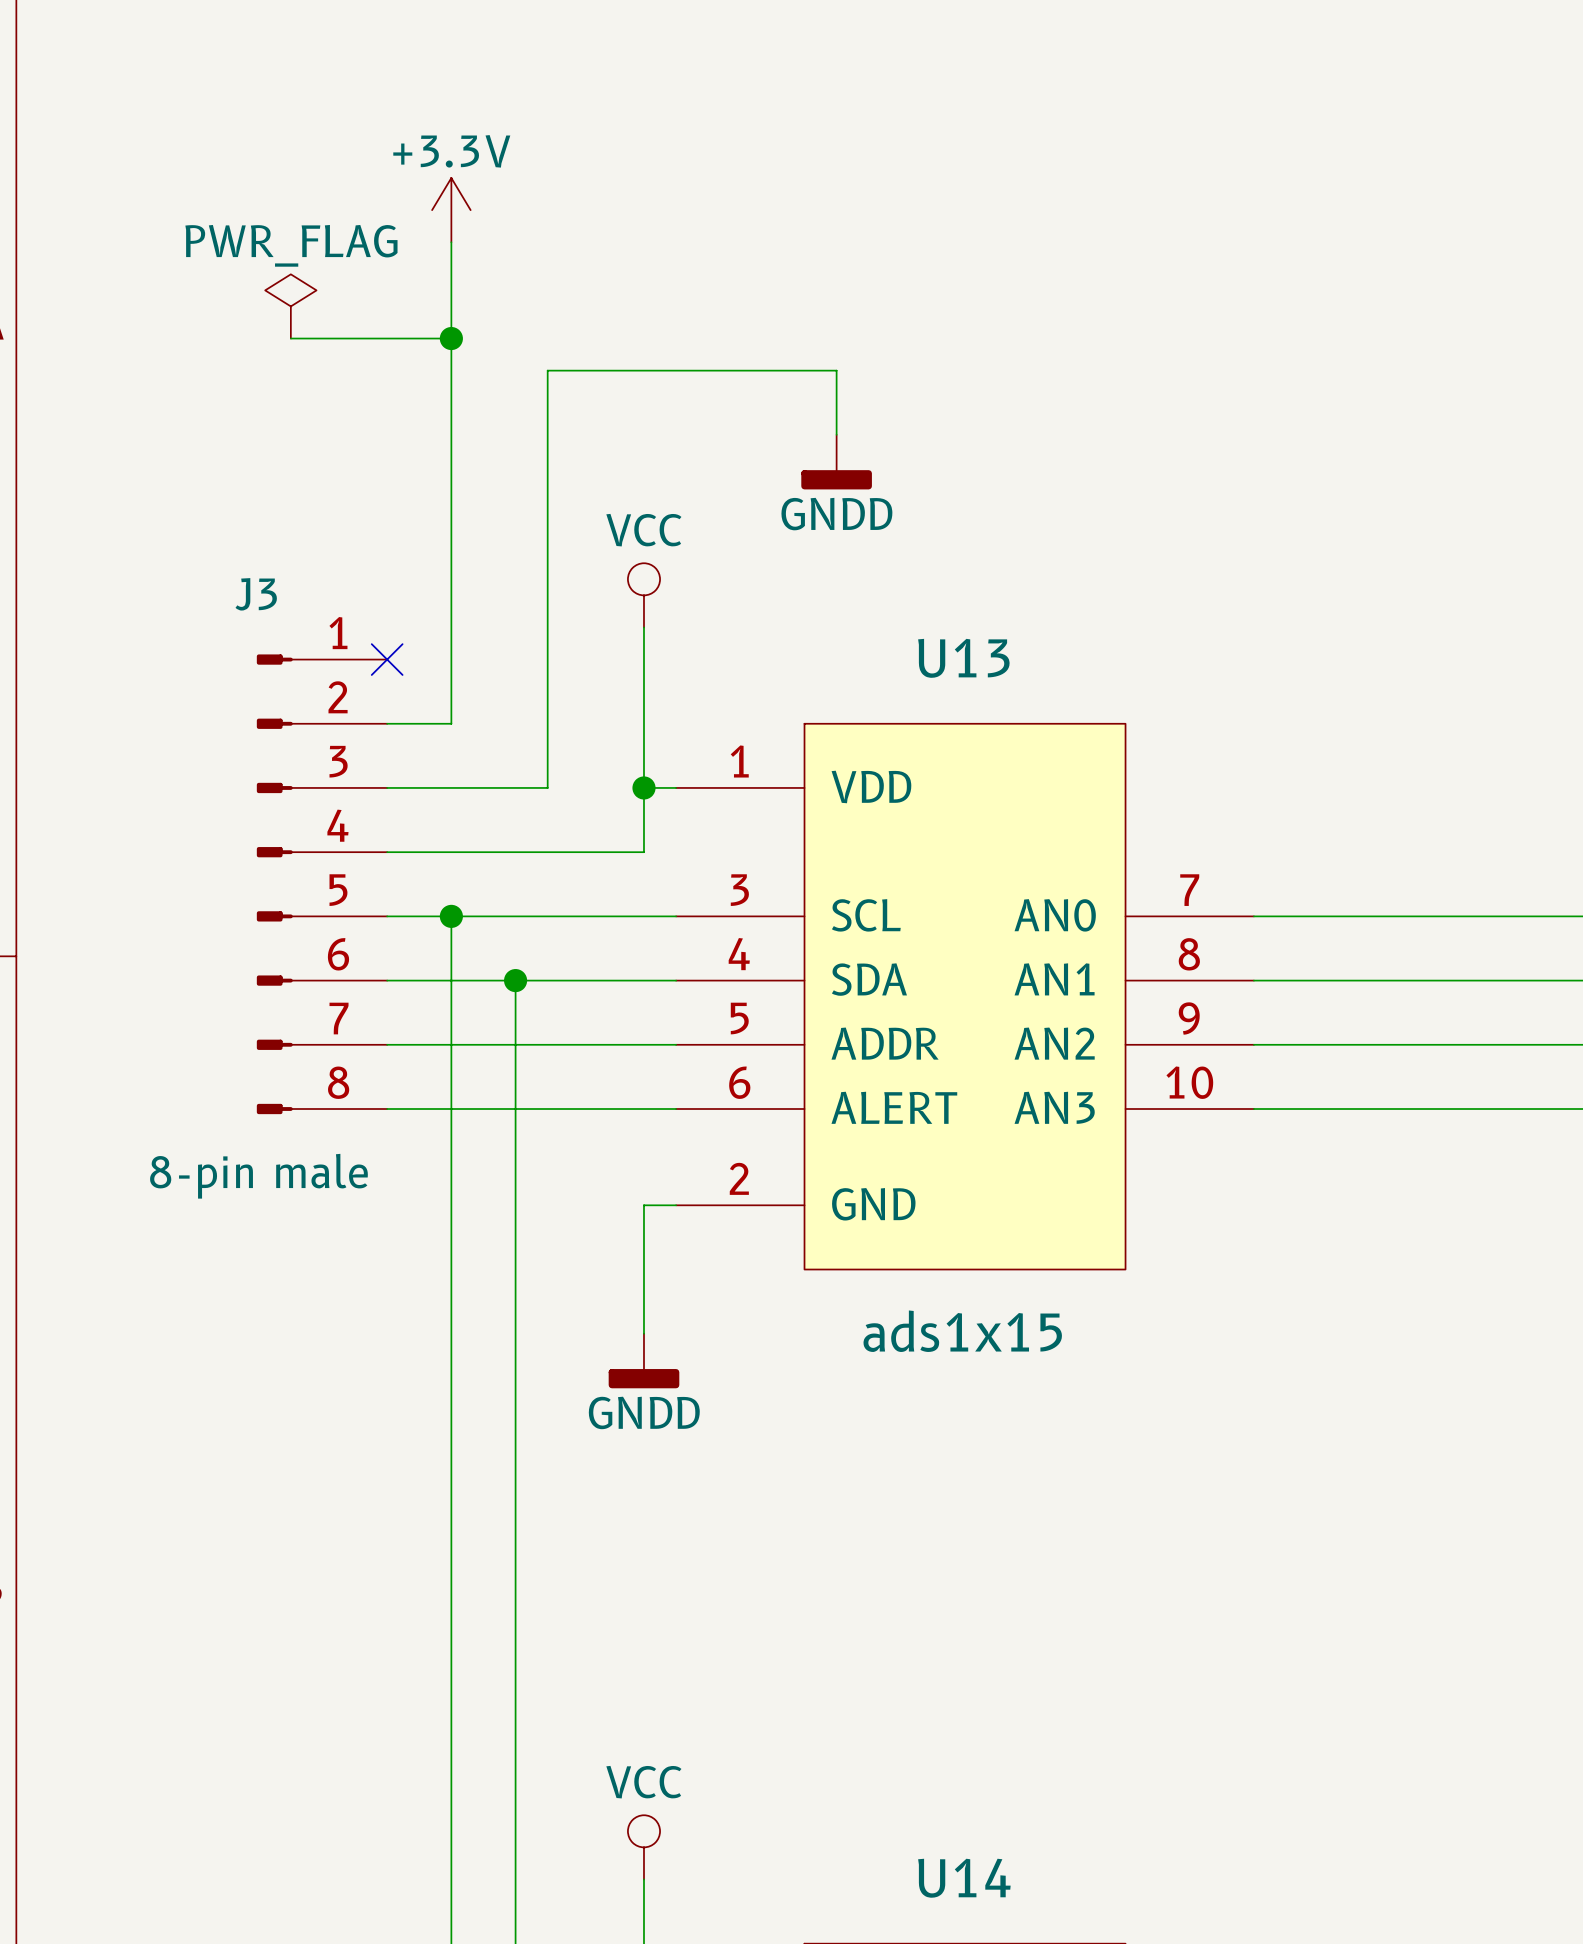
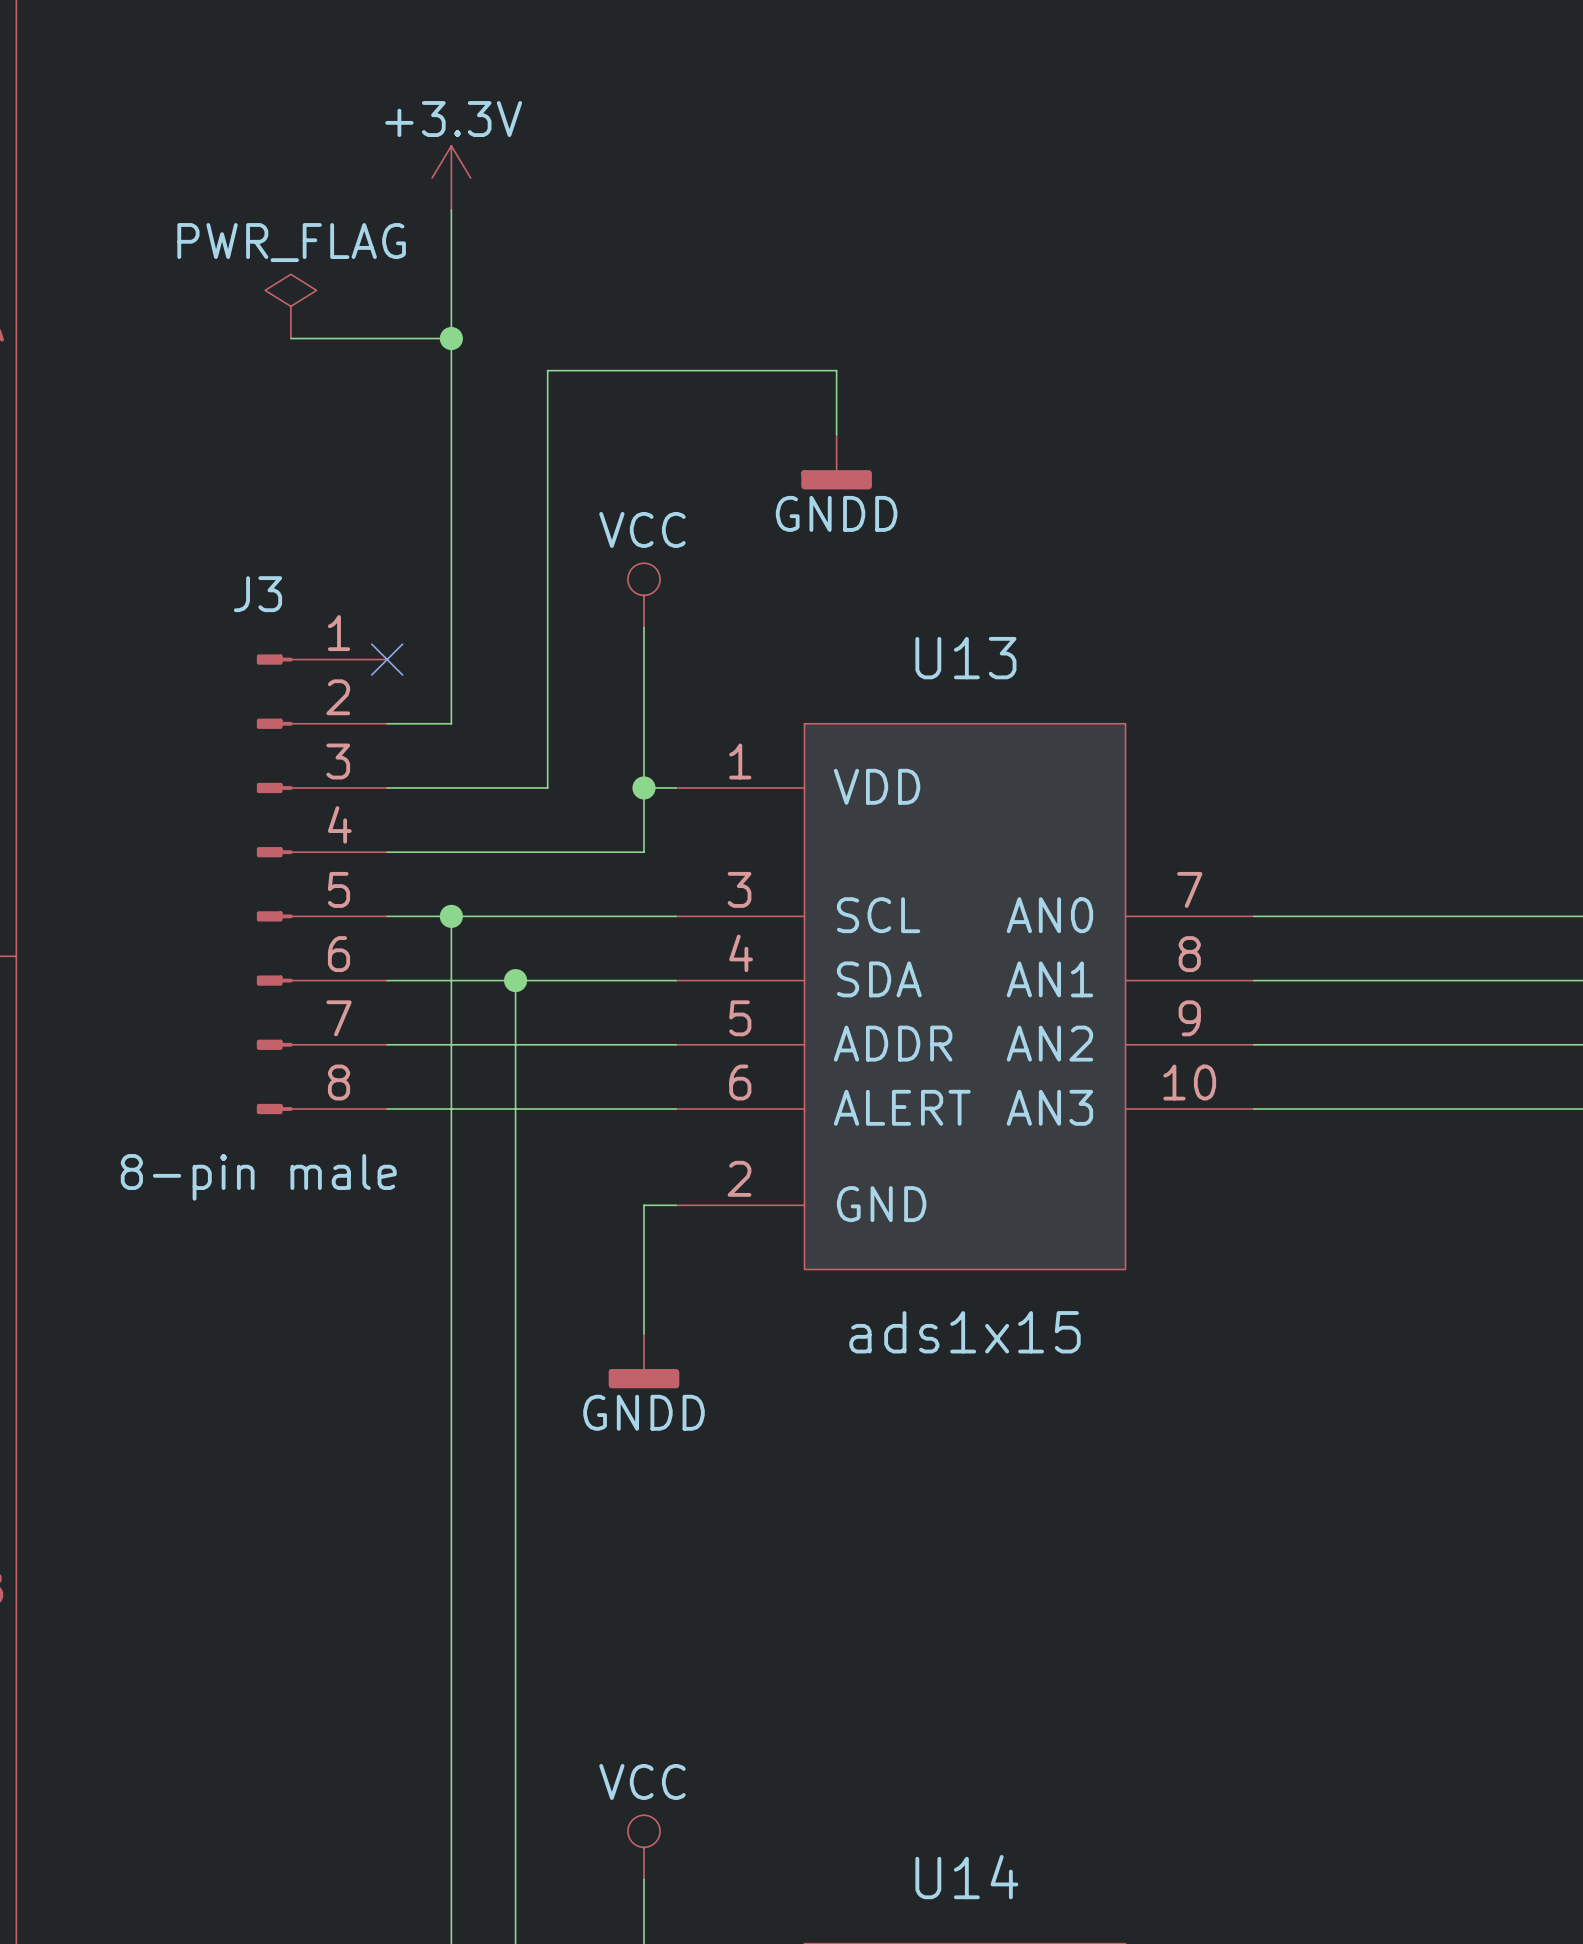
power symbol position: +3.3V (451, 210) -> +3.3V (451, 178)

